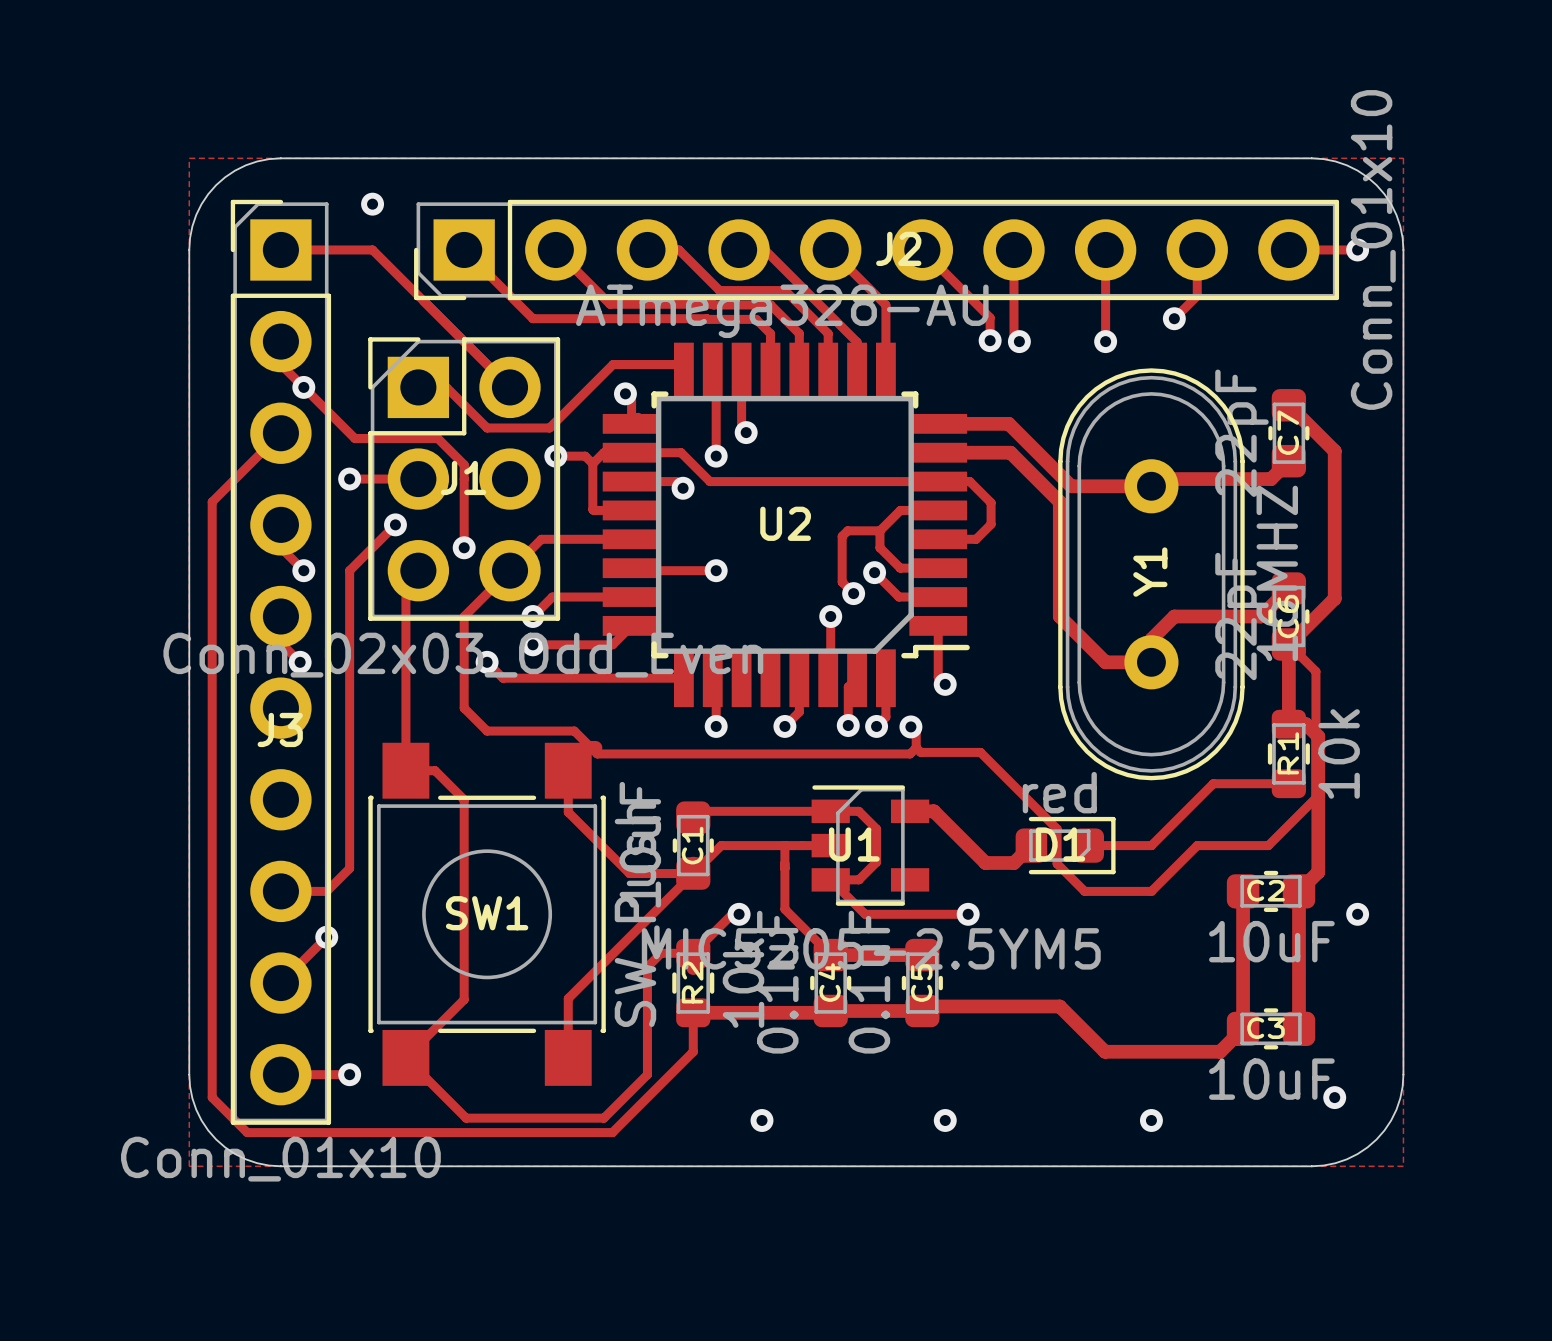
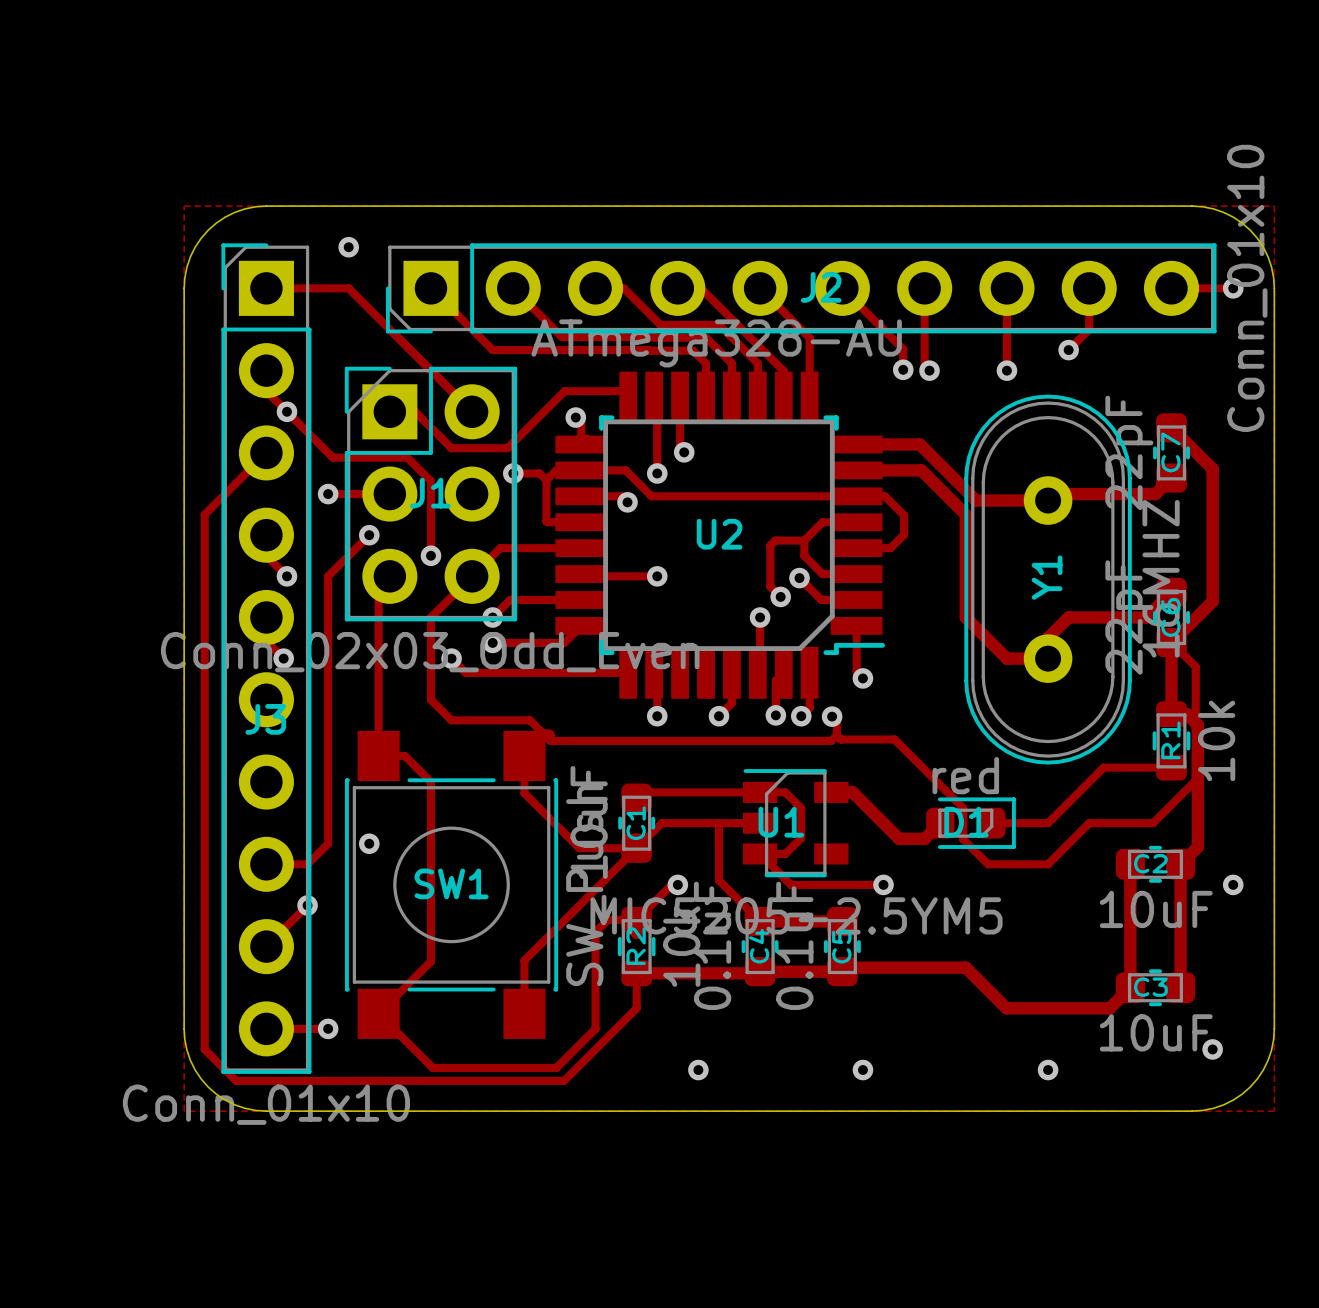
via: none -> (369, 843)

